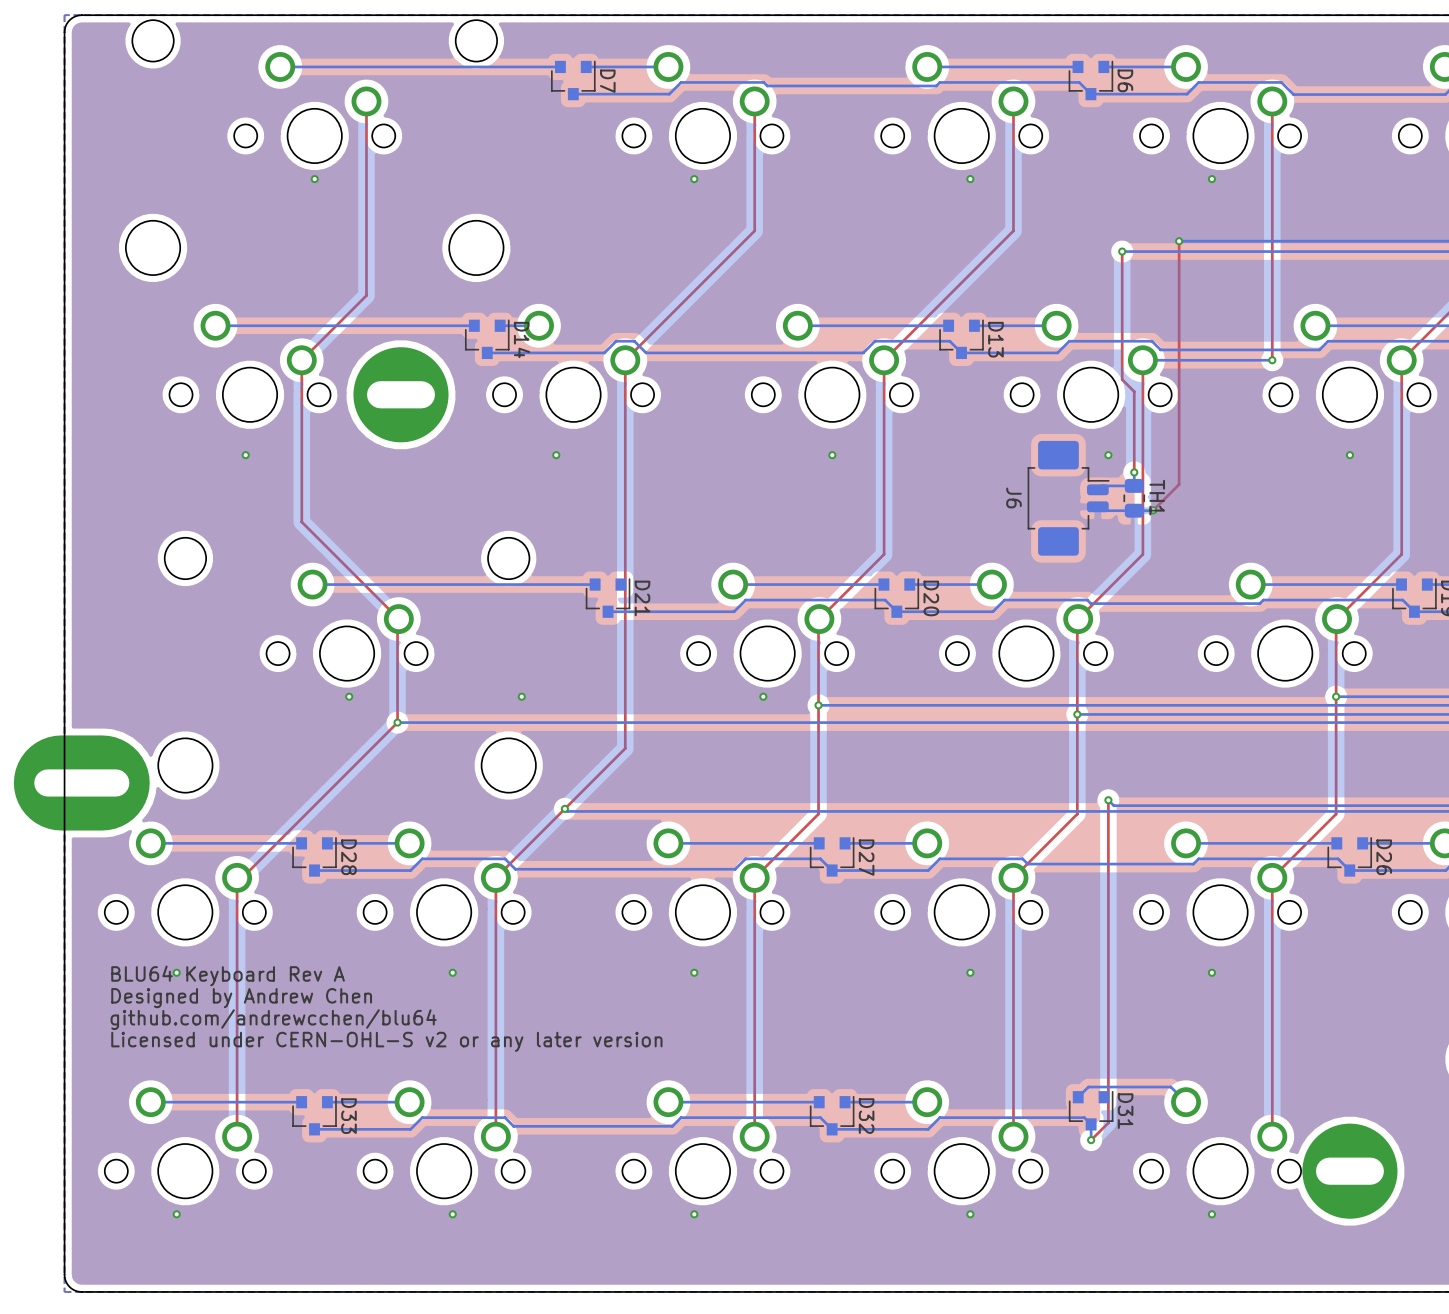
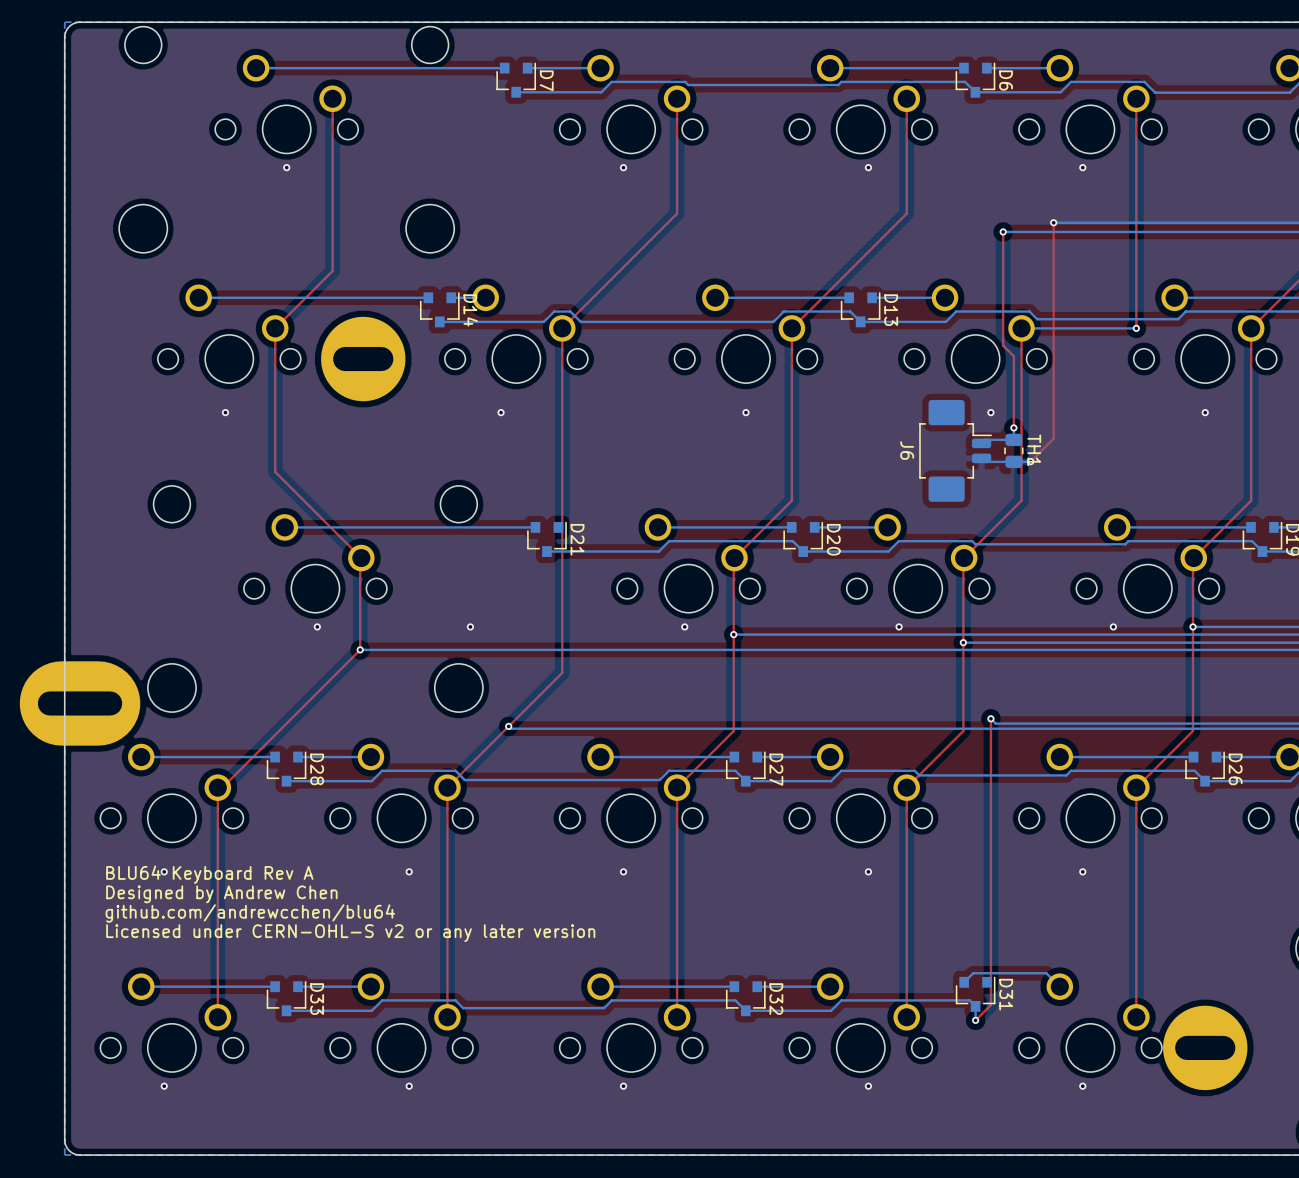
via: none -> (899, 626)
via: none -> (1113, 626)

